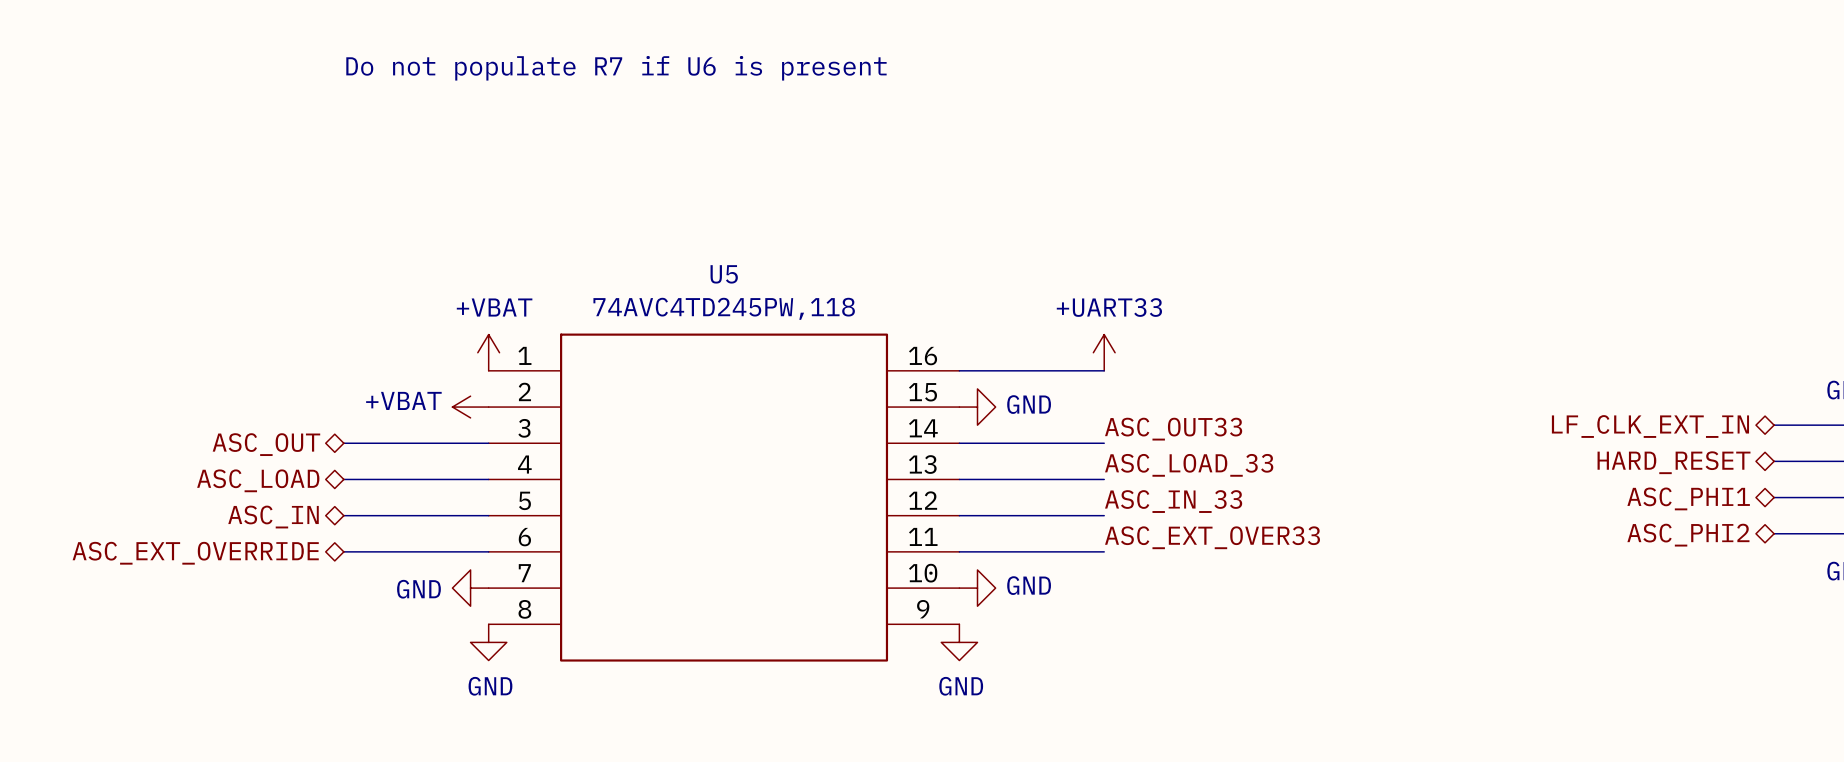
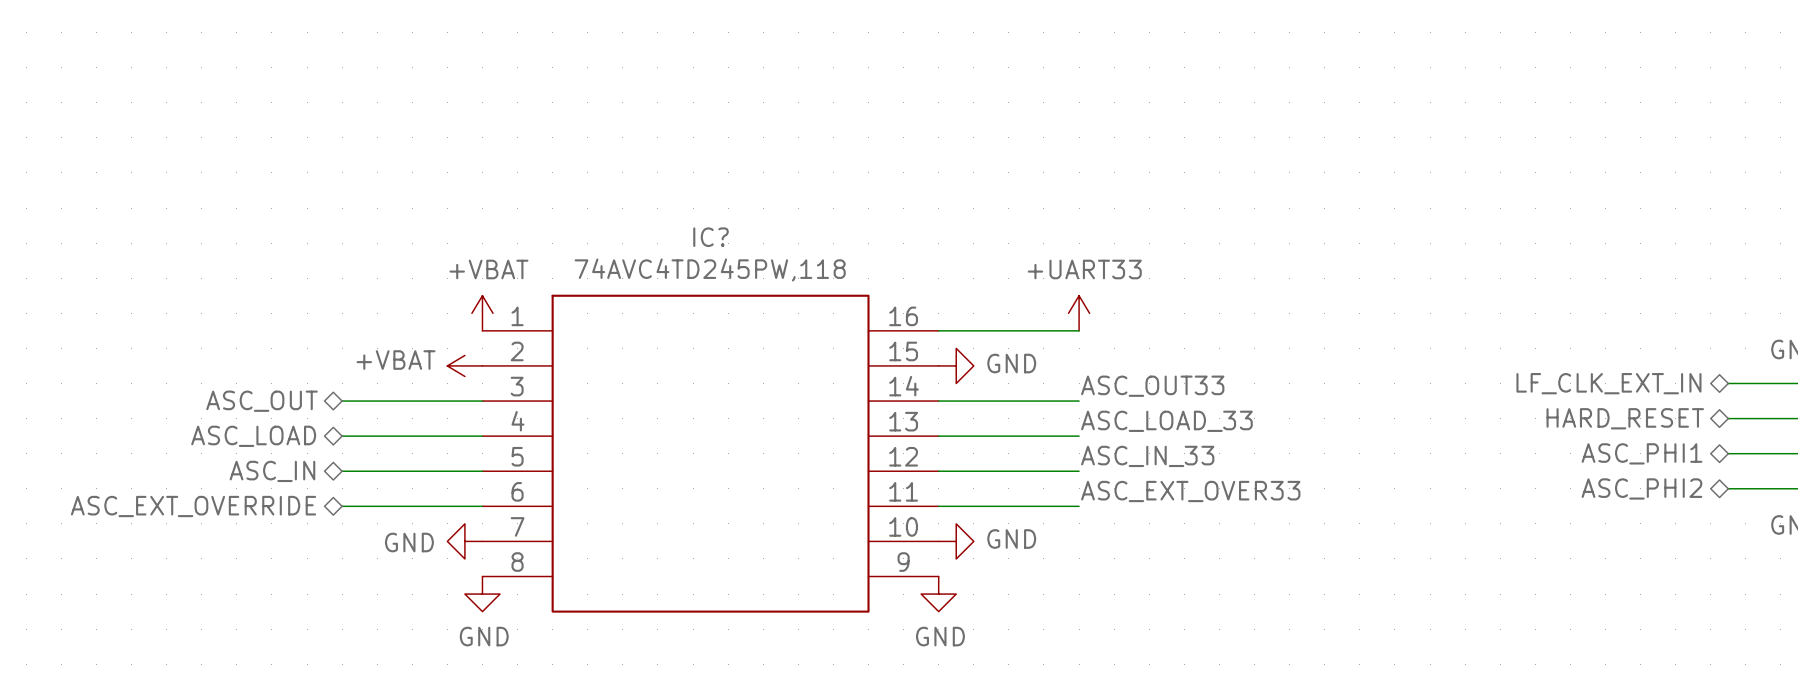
text: Do not populate R7 if U6 is present (616, 68) -> none
U5 name: U5 (724, 274) -> IC? (711, 237)

